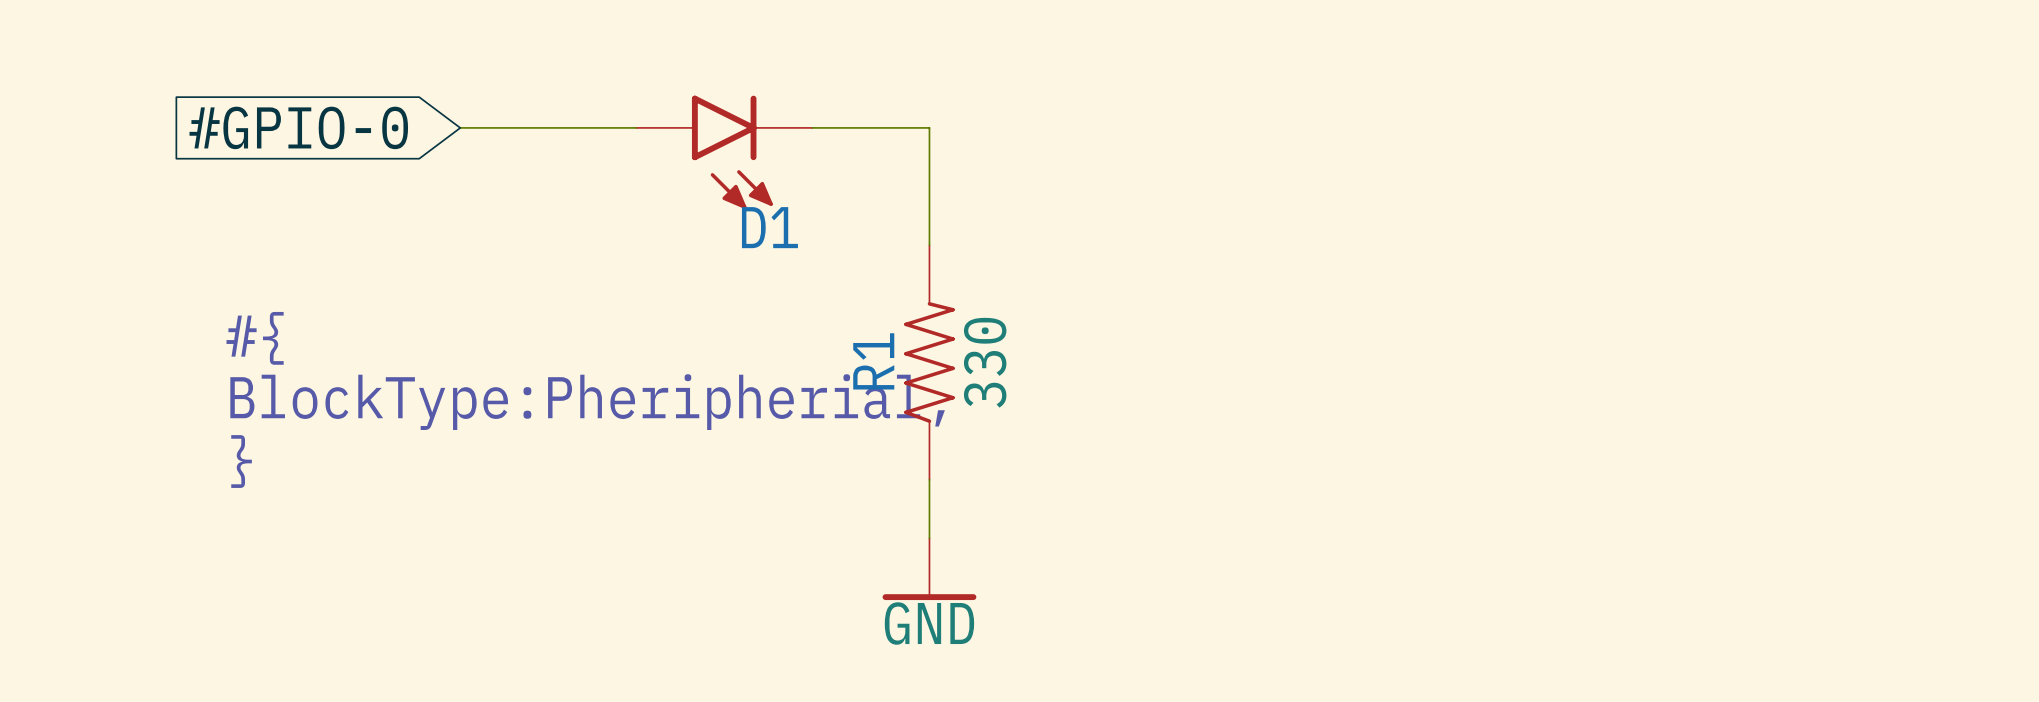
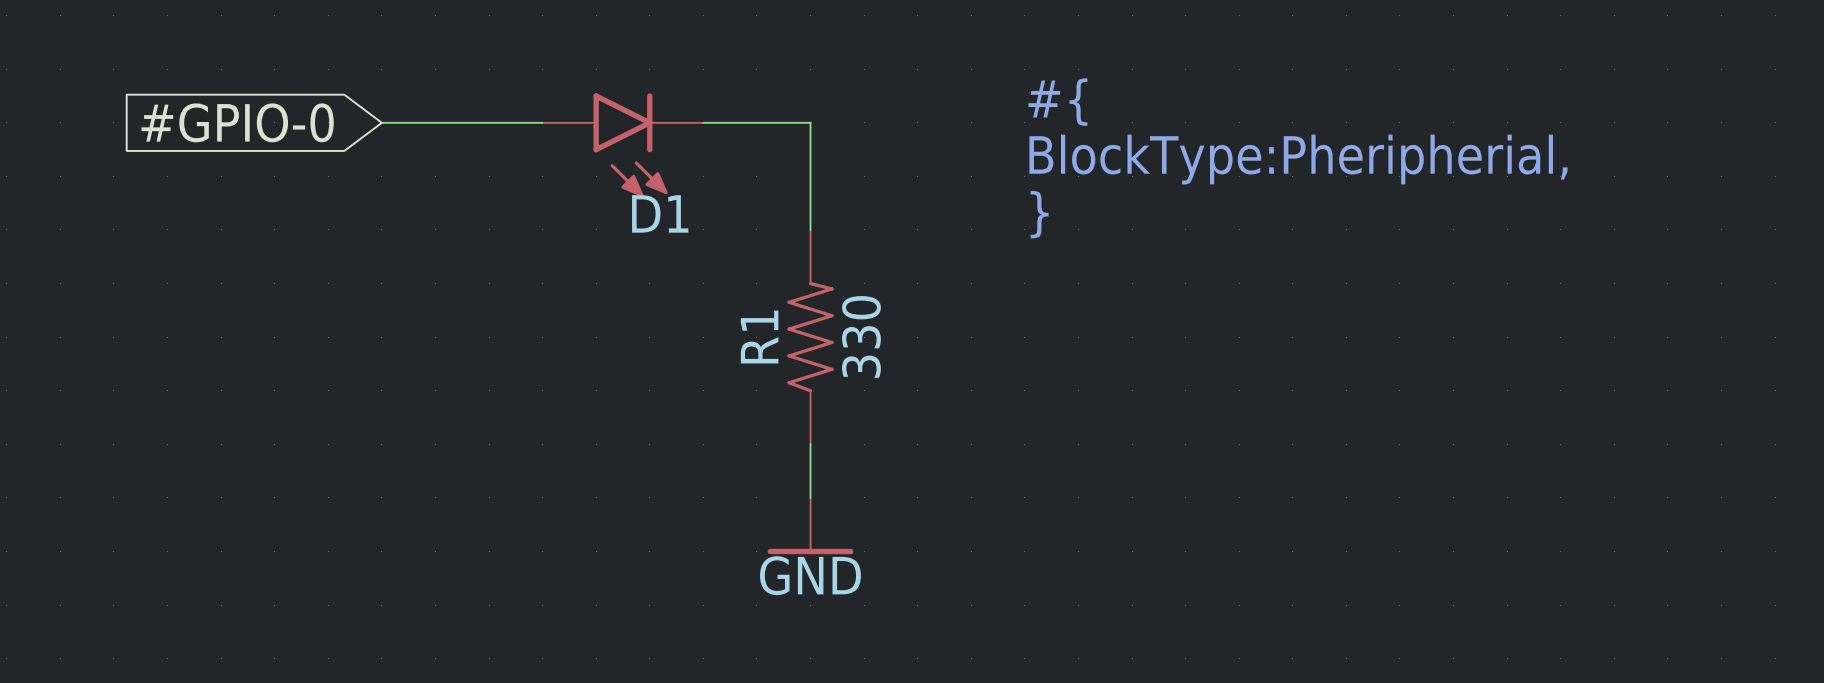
text: none -> #{ (1057, 102)
text: none -> BlockType:Pheripherial, (1298, 159)
text: none -> } (1039, 214)
text: #{ (255, 338) -> none
text: BlockType:Pheripherial, (587, 402) -> none
text: } (241, 461) -> none

